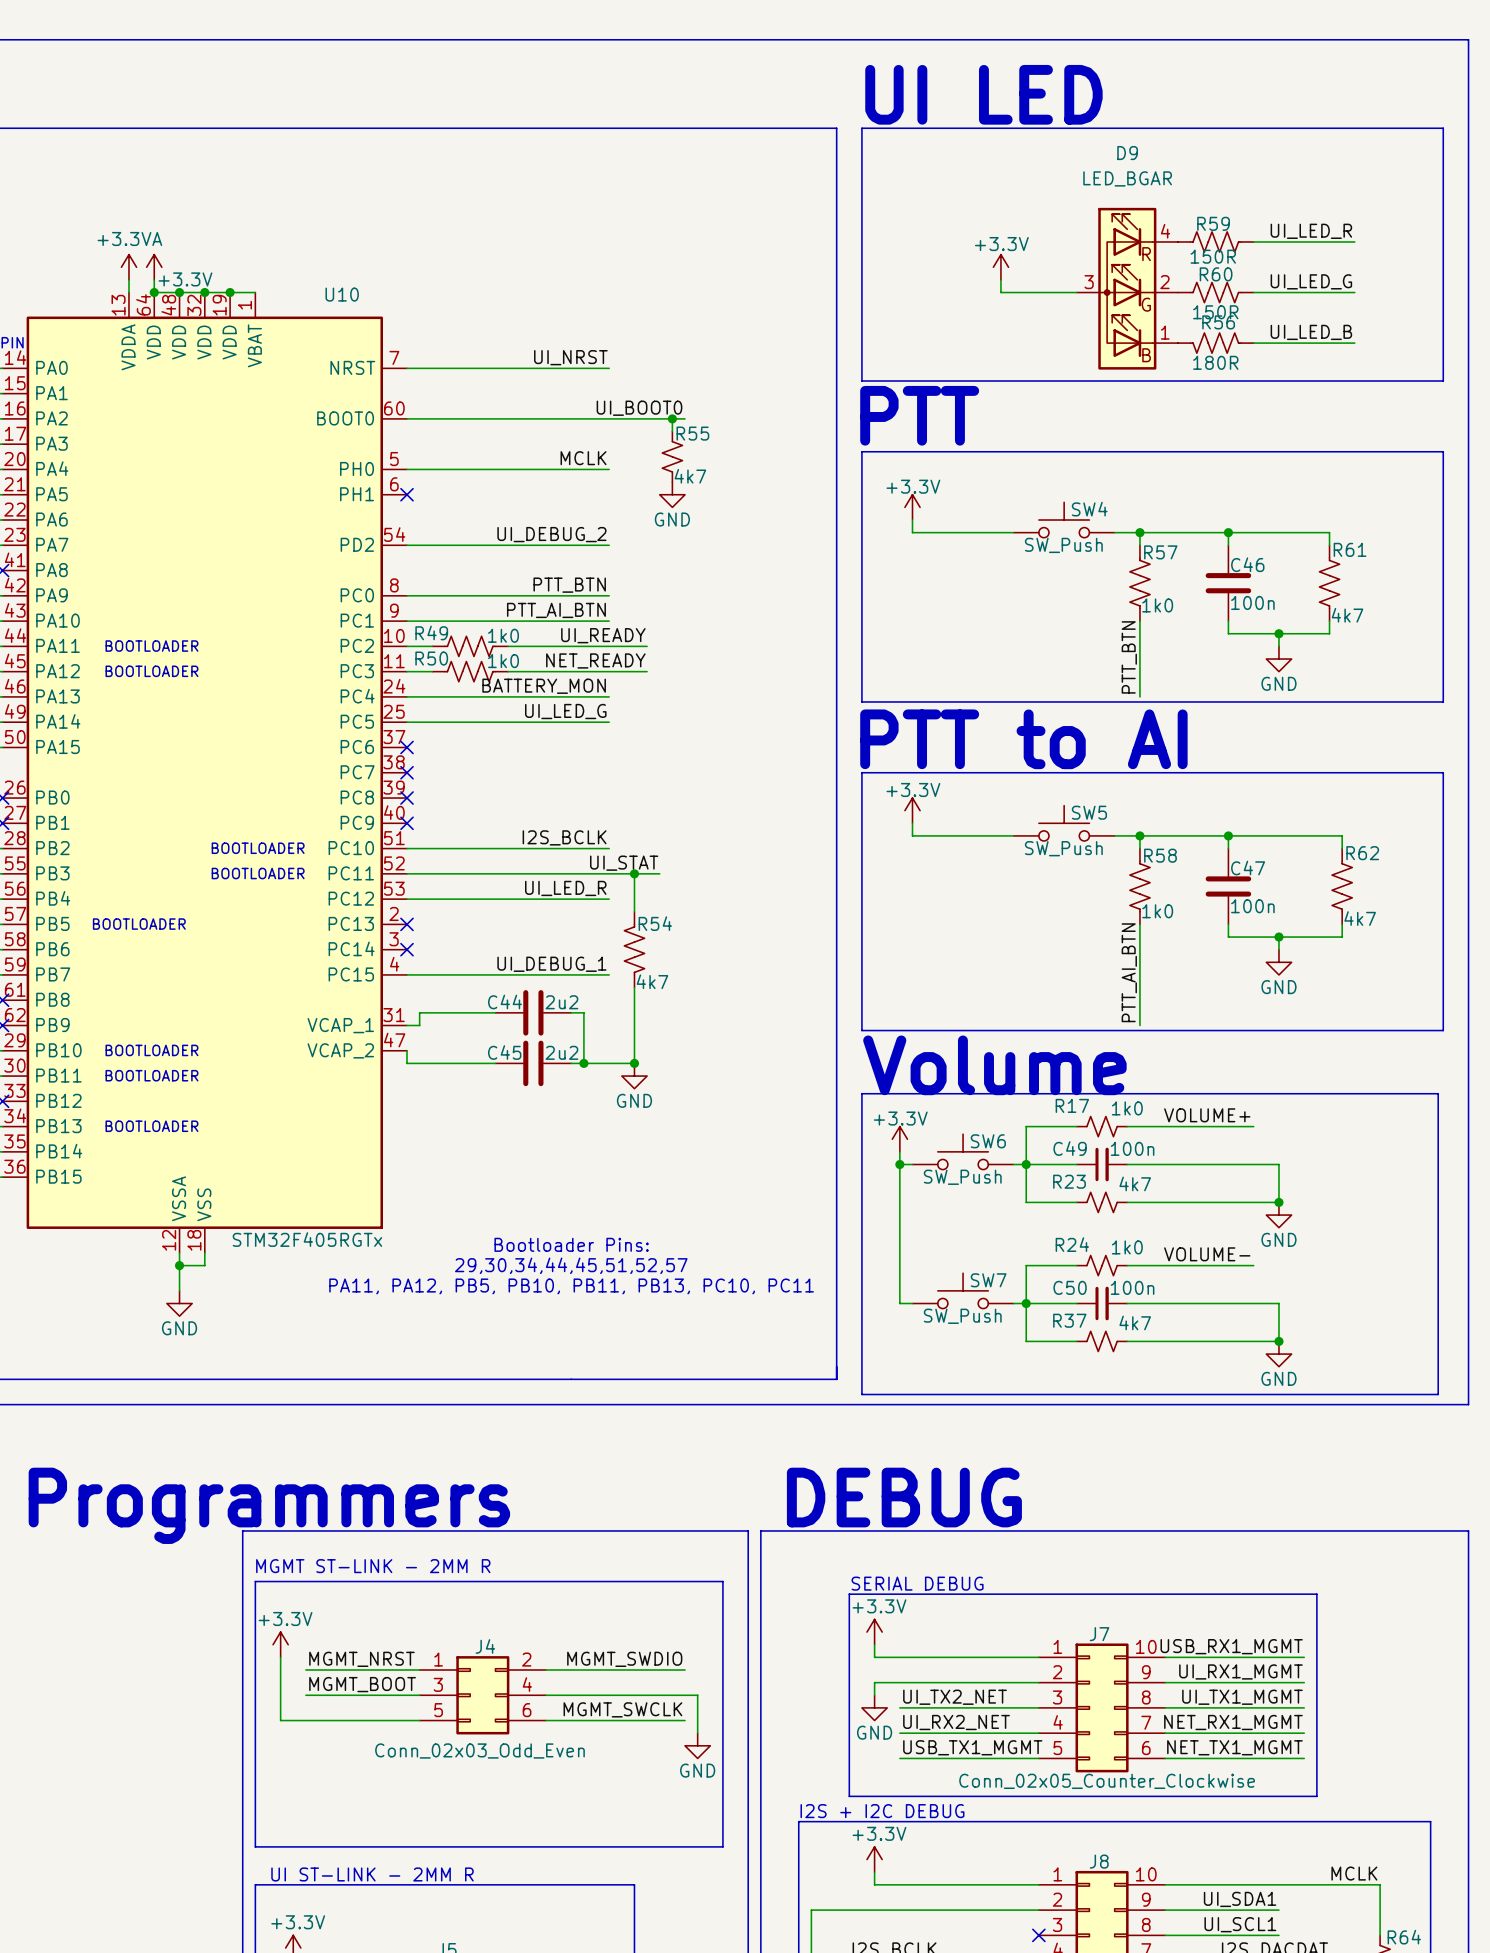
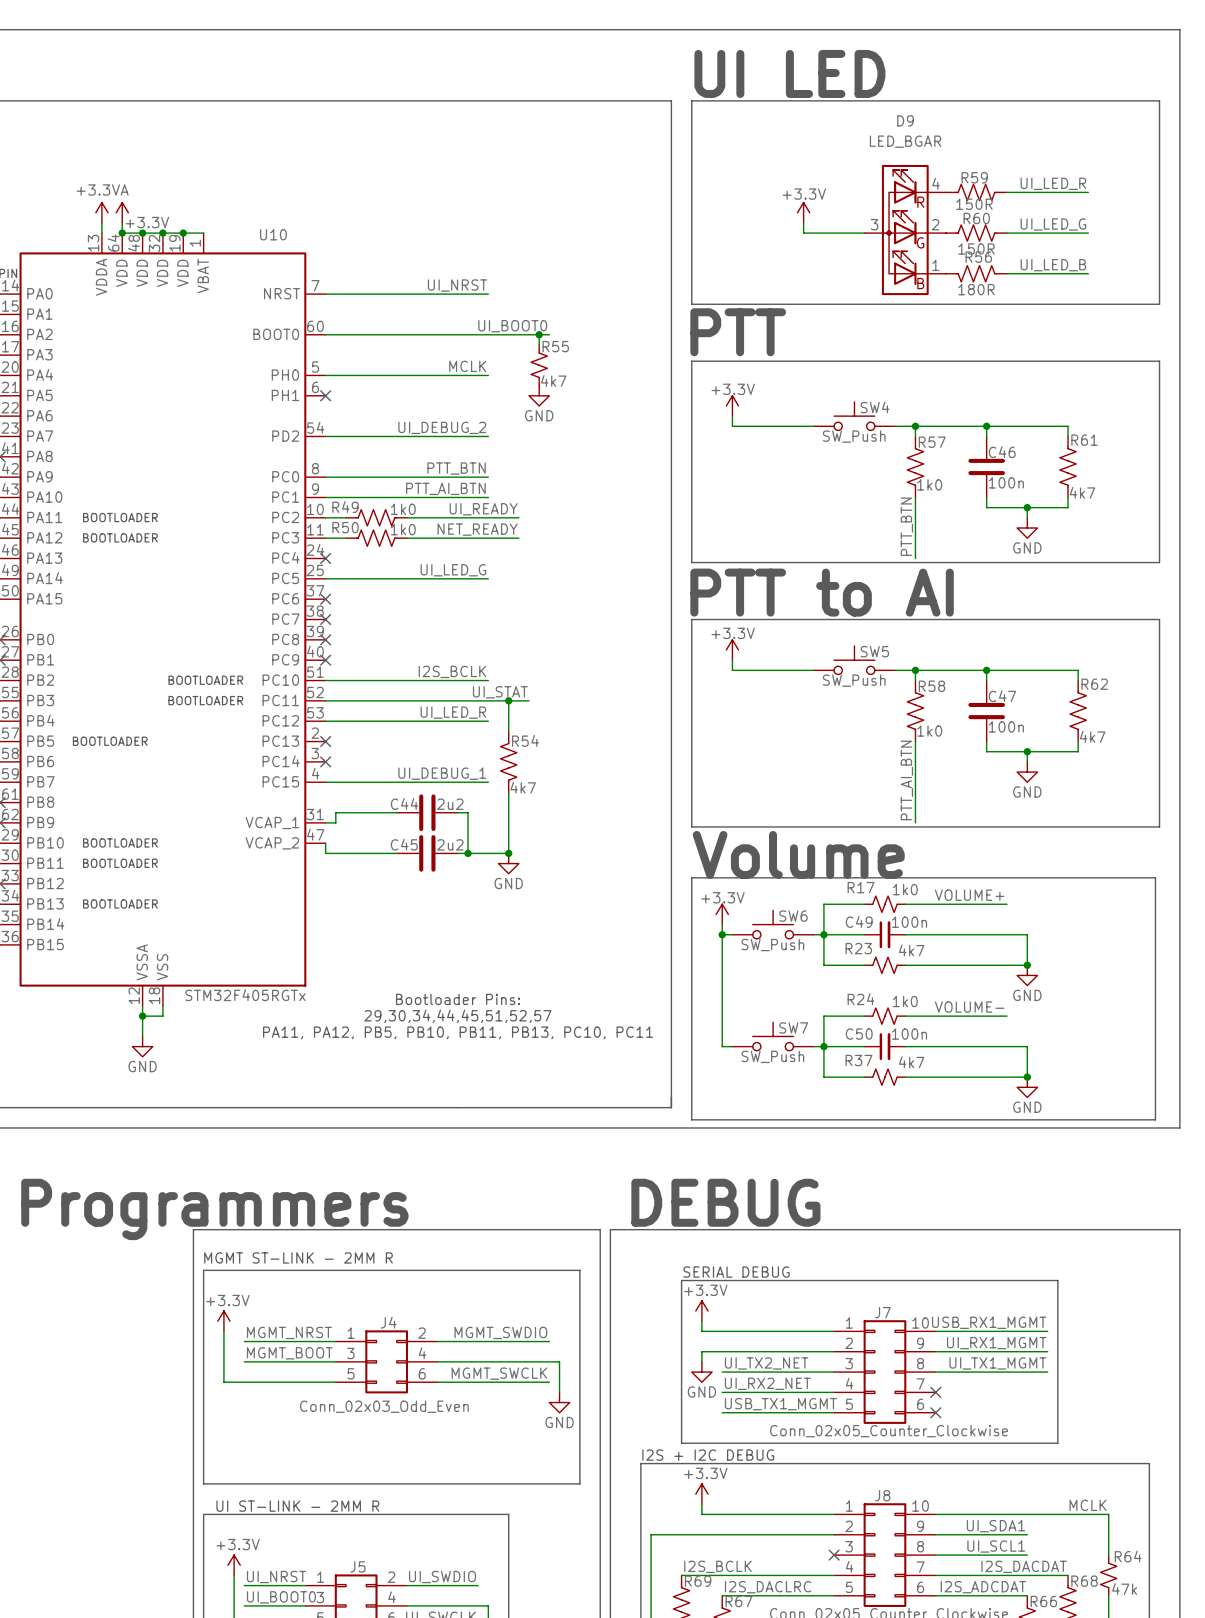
label: BATTERY_MON (544, 686) -> none
wire: (407, 696) (609, 696) -> none
no-connect mark: none -> (325, 558)
label: NET_RX1_MGMT (1233, 1722) -> none
wire: (1165, 1733) (1304, 1733) -> none
no-connect mark: none -> (935, 1392)
label: NET_TX1_MGMT (1234, 1747) -> none
wire: (1165, 1758) (1304, 1758) -> none
no-connect mark: none -> (935, 1412)

